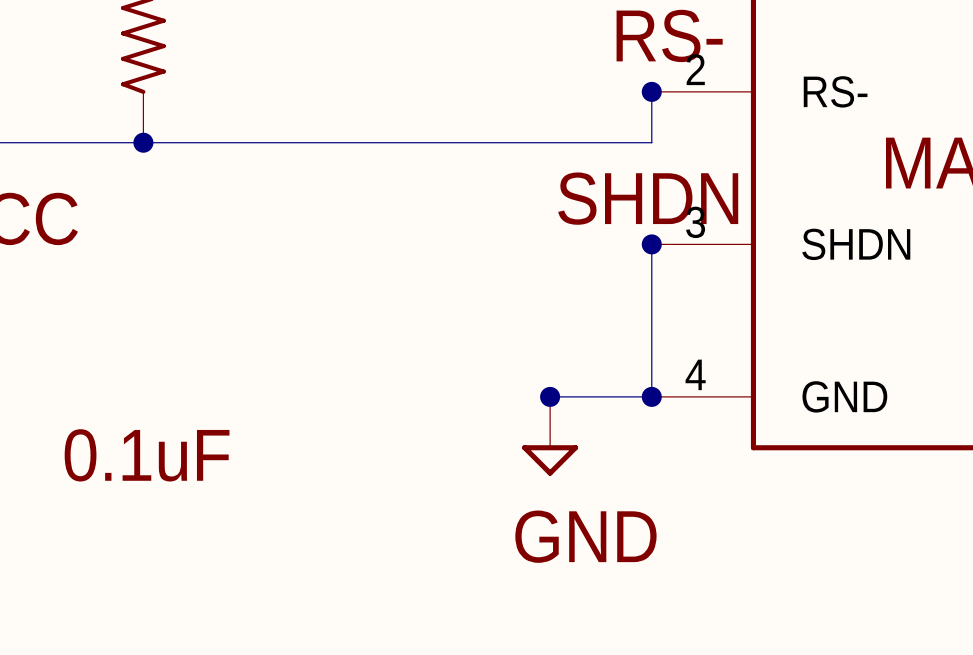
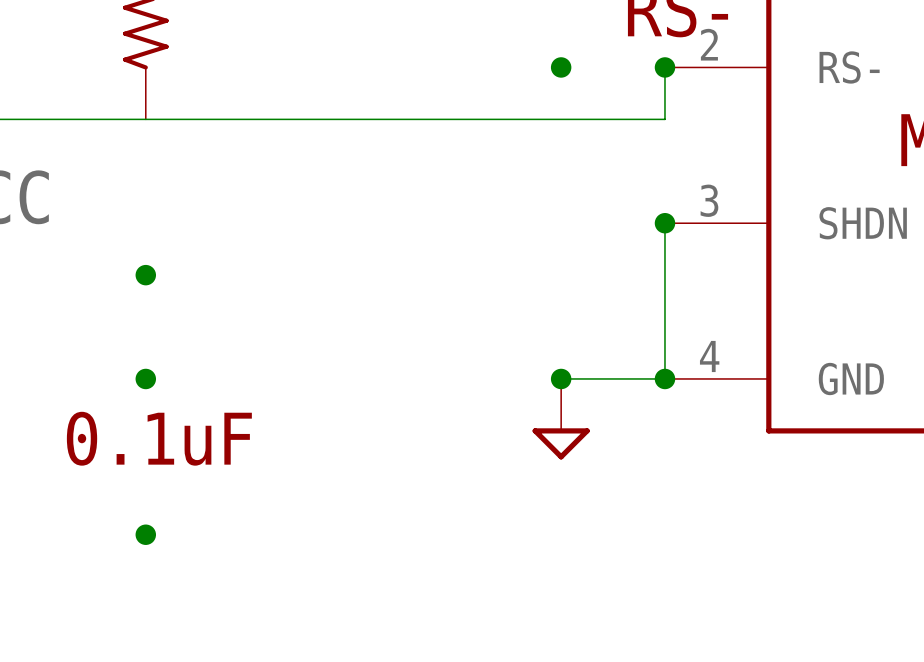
junction: none -> (561, 67)
junction: (143, 142) -> none
text: SHDN (648, 198) -> none
junction: none -> (145, 275)
junction: none -> (145, 378)
power symbol text: GND (585, 536) -> none
junction: none -> (145, 534)

